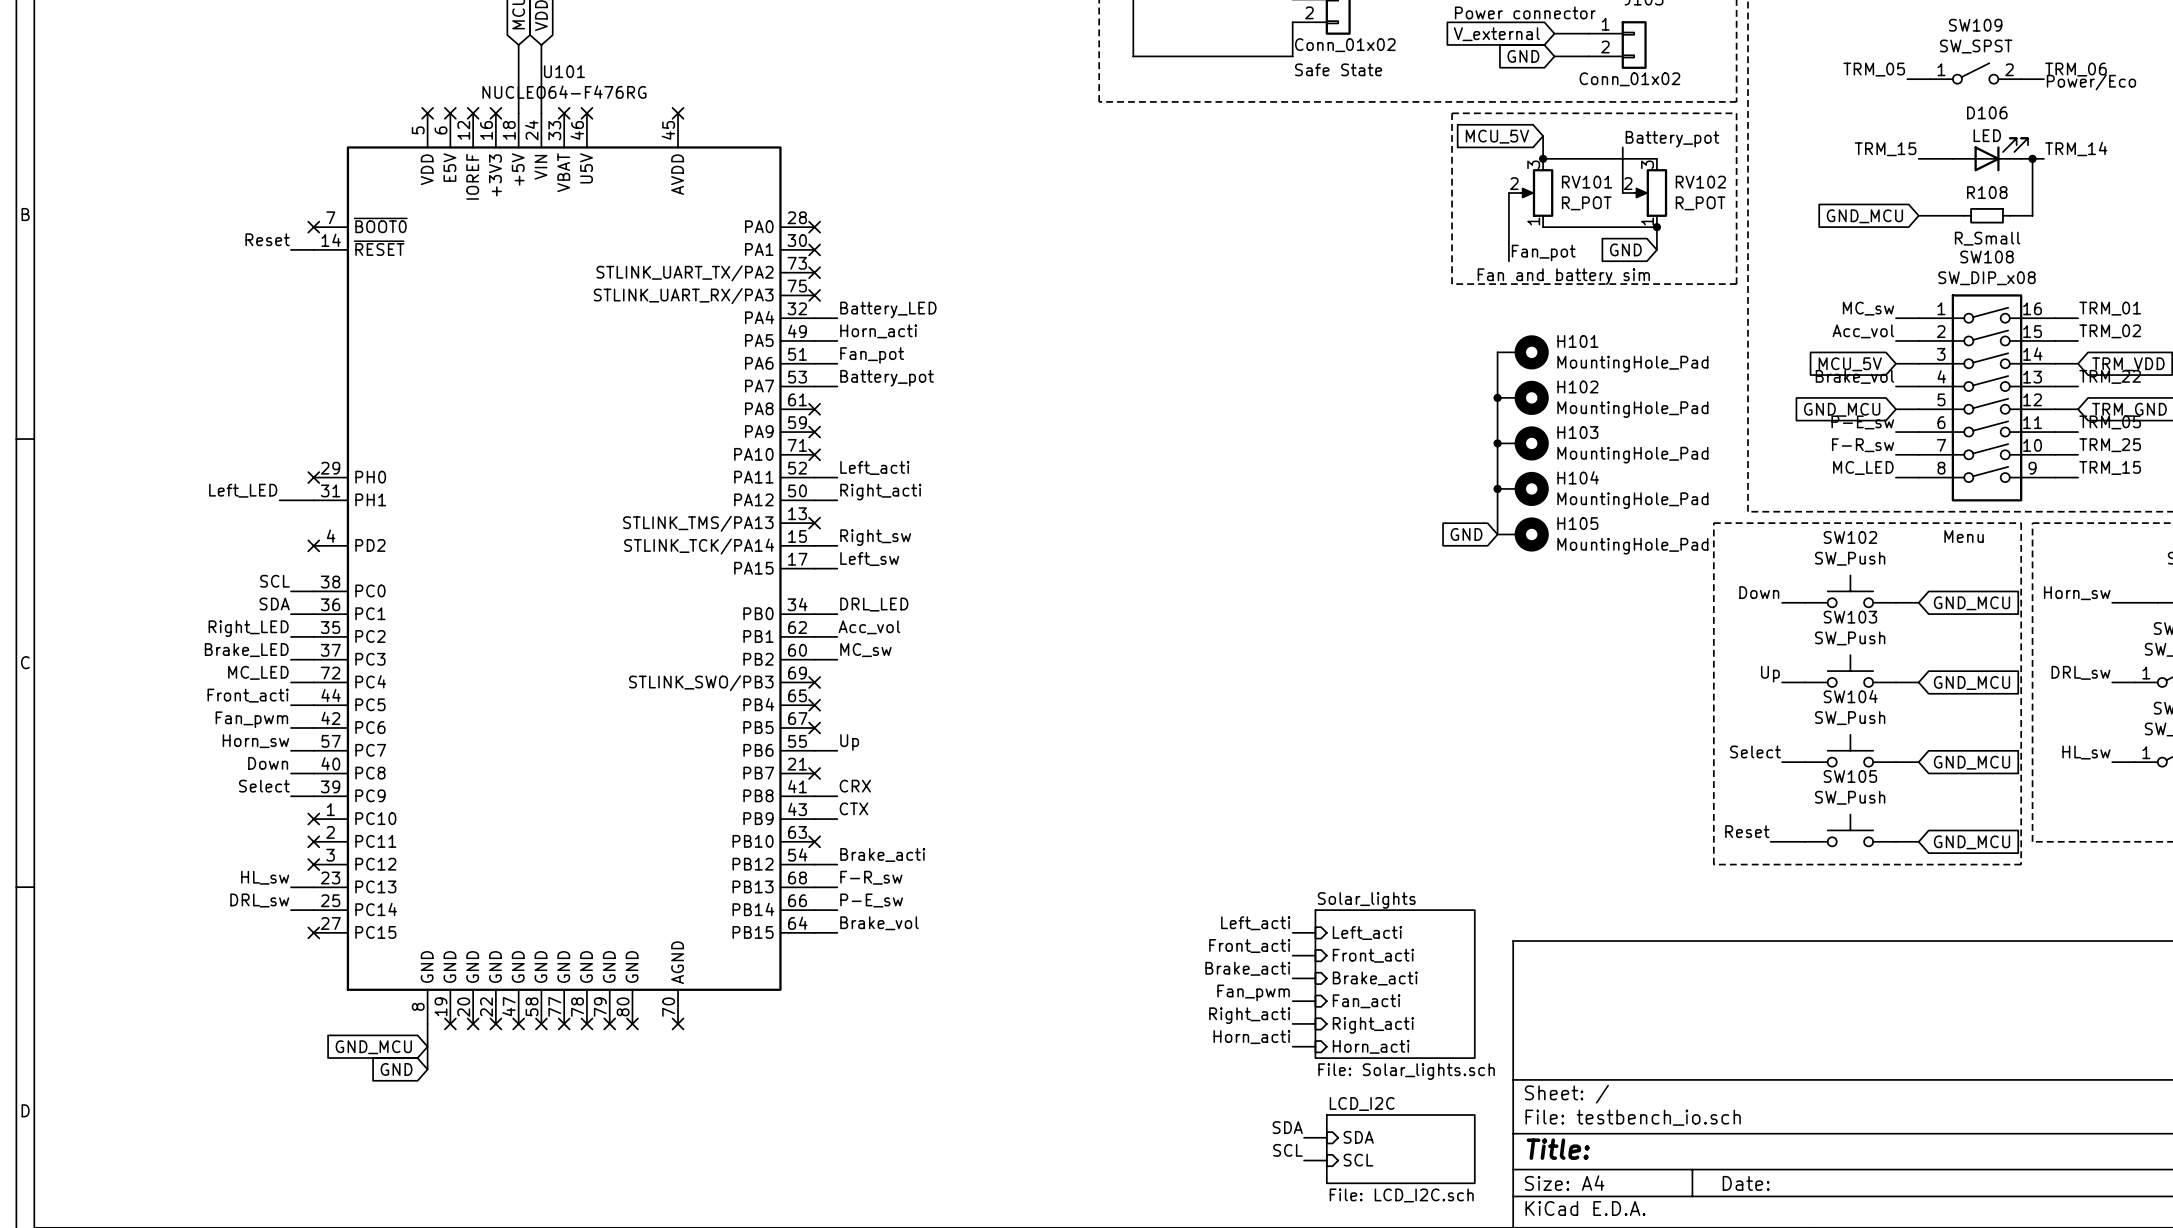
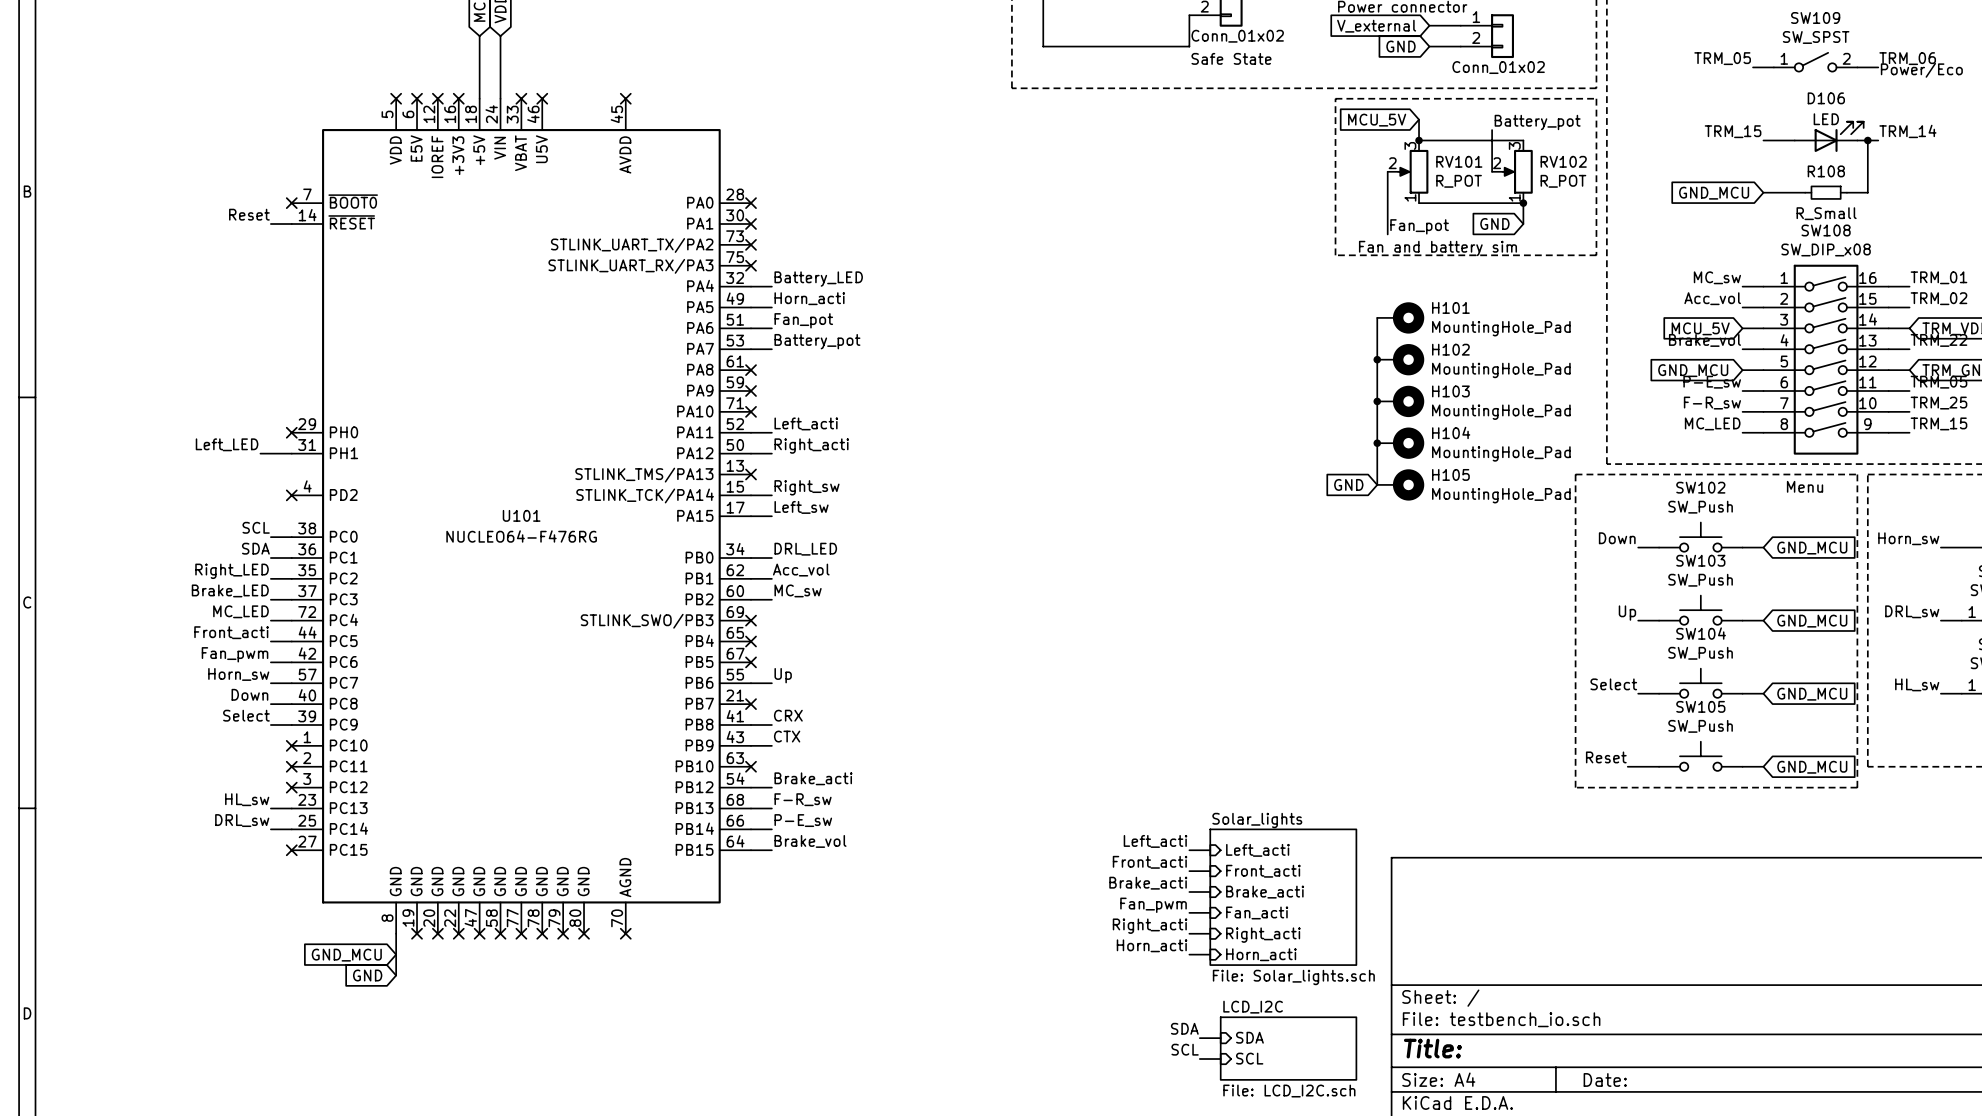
U101 name position: U101 (564, 71) -> U101 (521, 515)
U101 value position: NUCLEO64-F476RG (564, 92) -> NUCLEO64-F476RG (521, 536)

